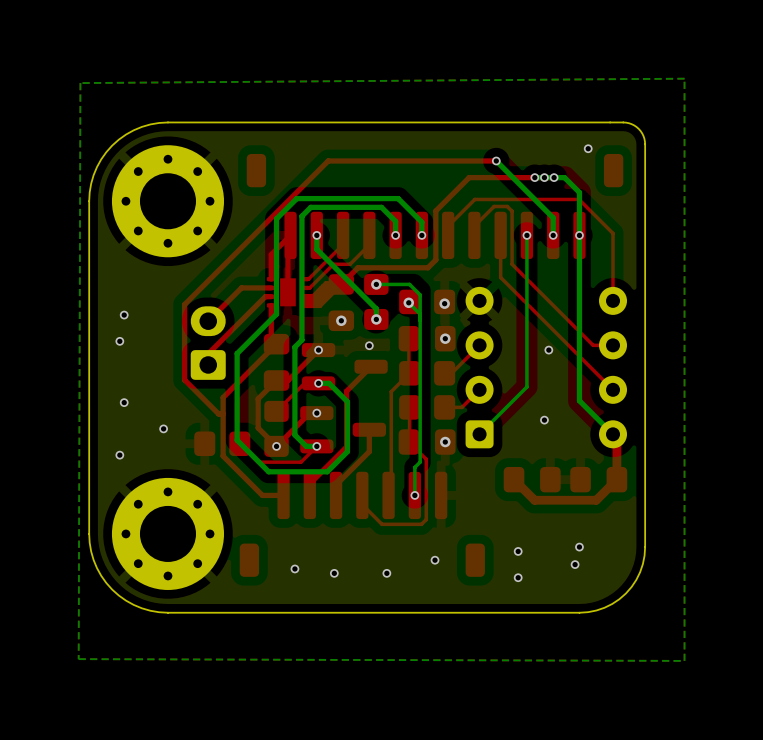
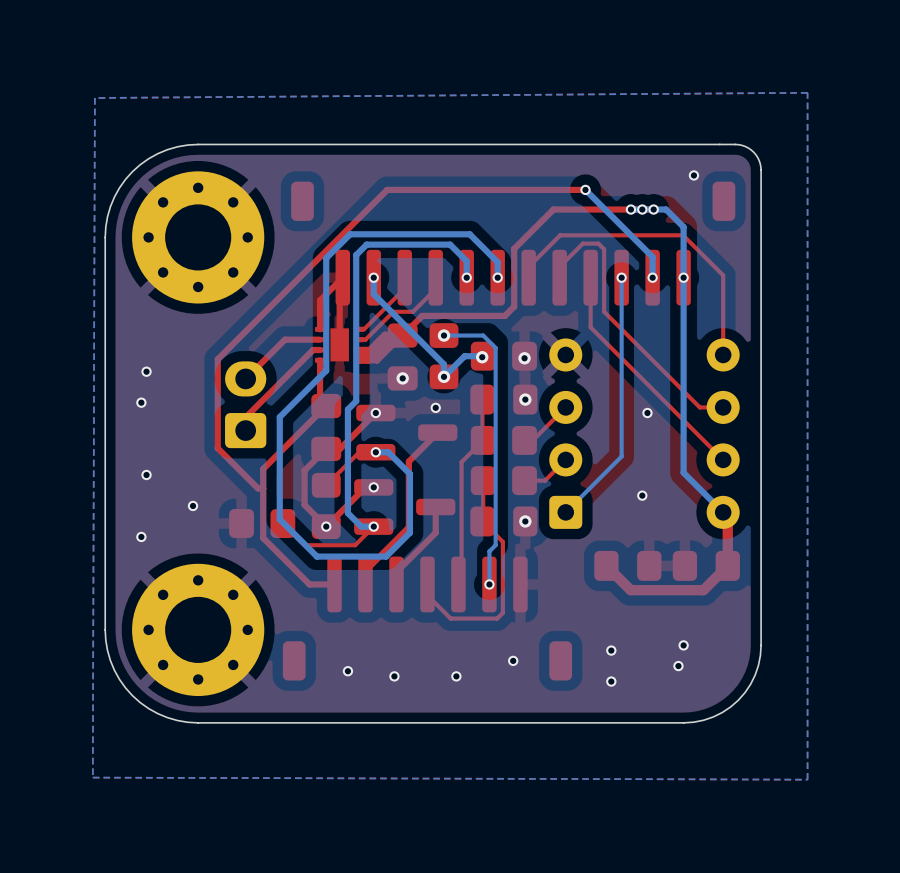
bottom track: none -> (481, 356) (464, 356) (443, 376)
bottom track: (408, 302) (420, 314) -> none

